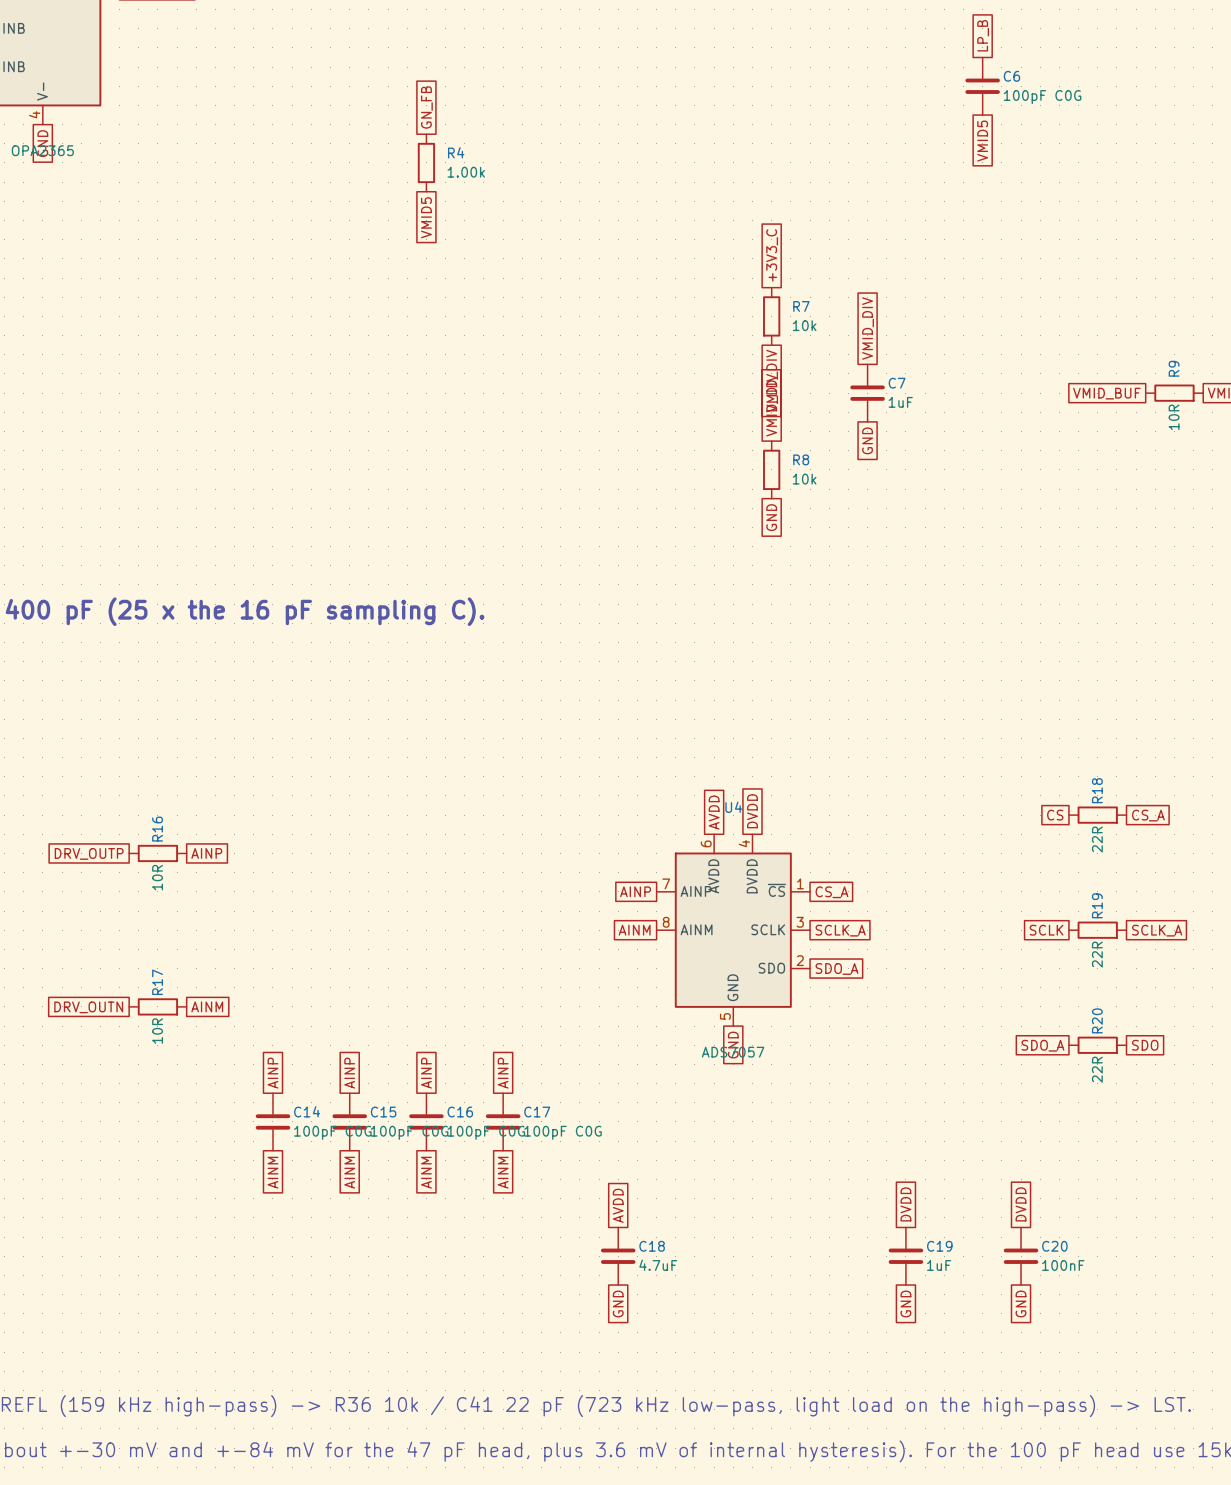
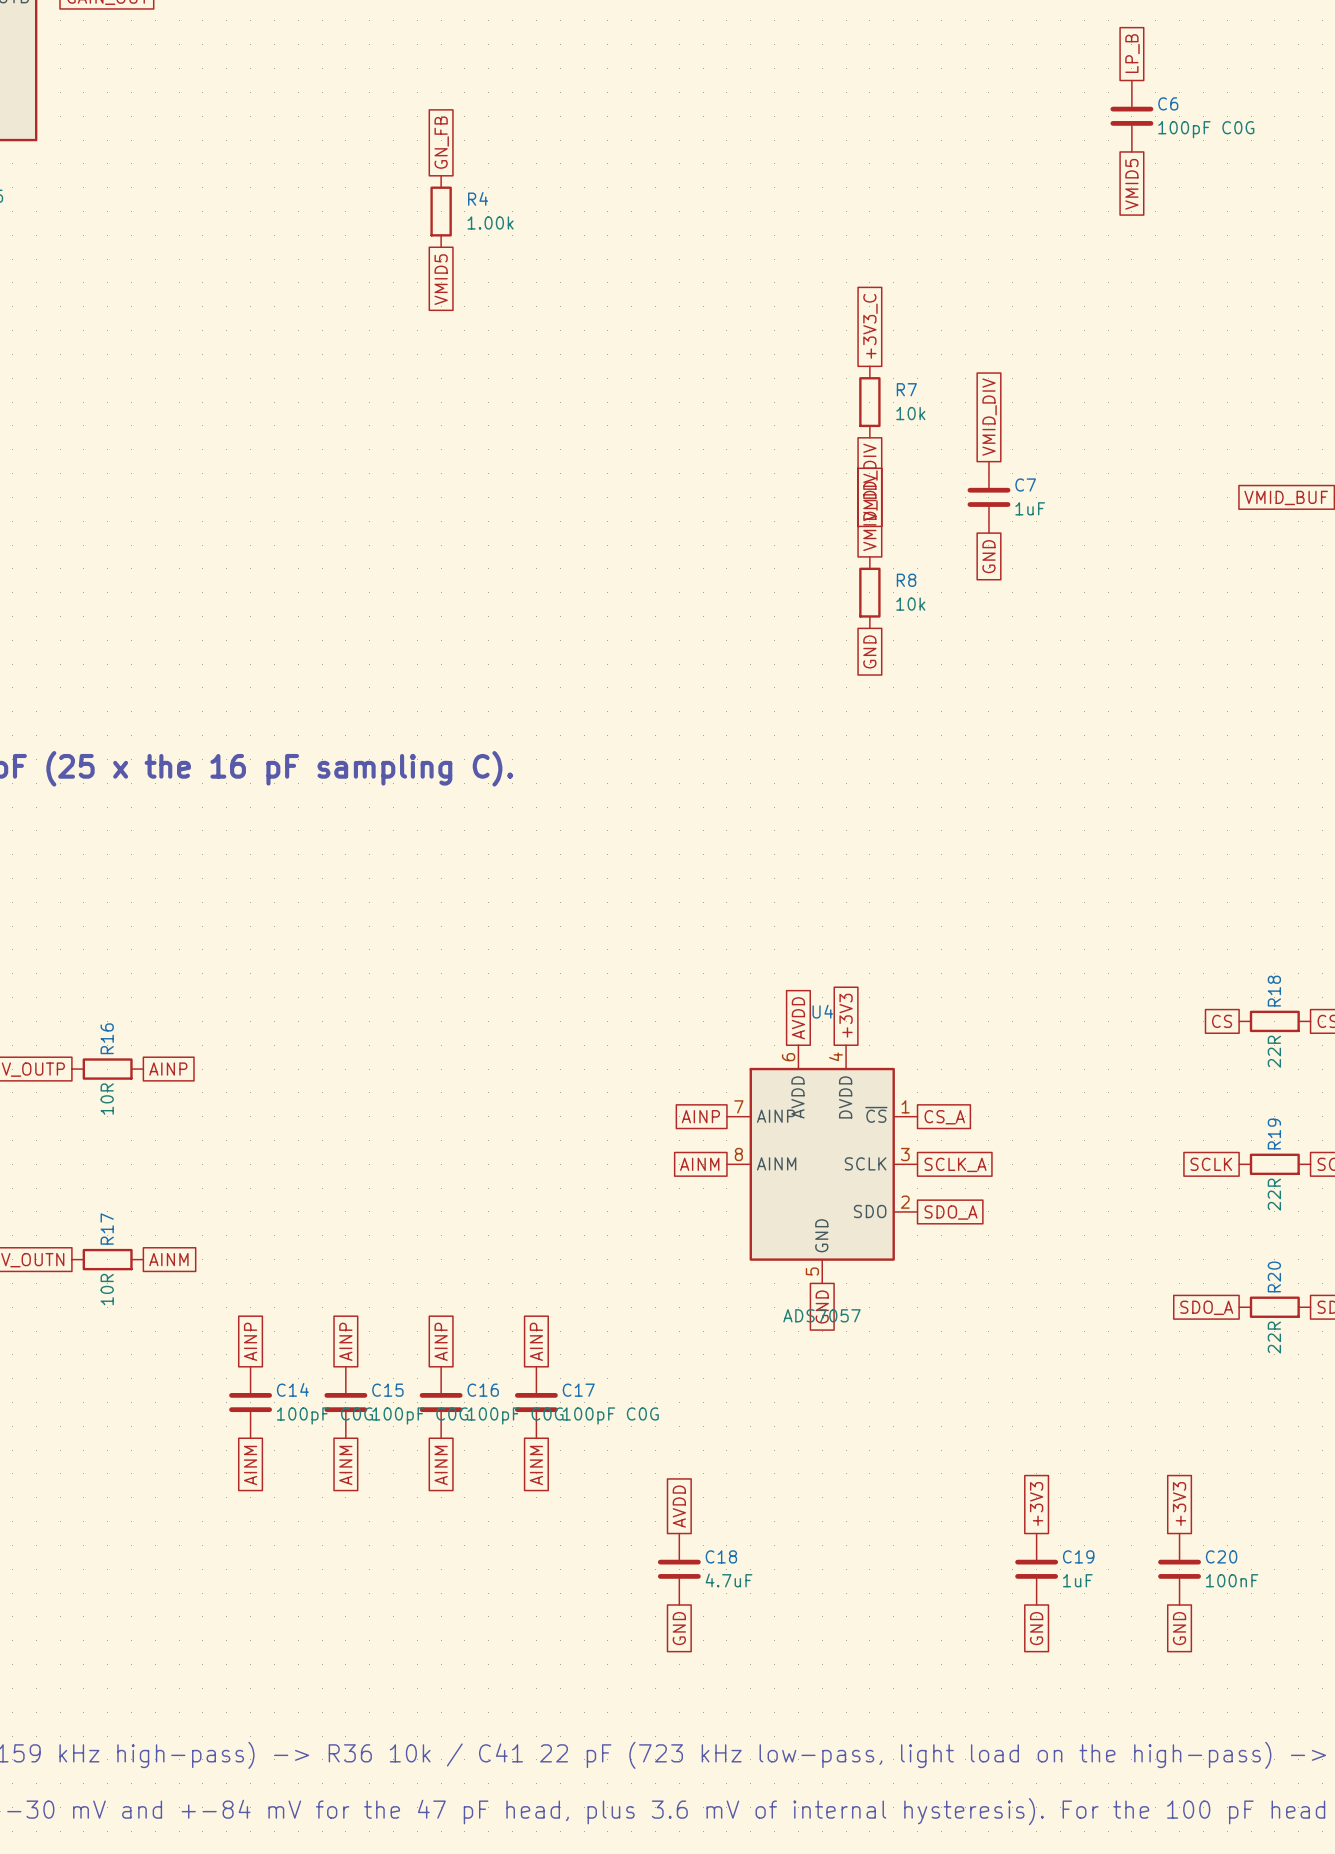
global label: DVDD (752, 811) -> +3V3 (846, 1015)
global label: DVDD (905, 1204) -> +3V3 (1036, 1504)
global label: DVDD (1021, 1204) -> +3V3 (1179, 1504)

